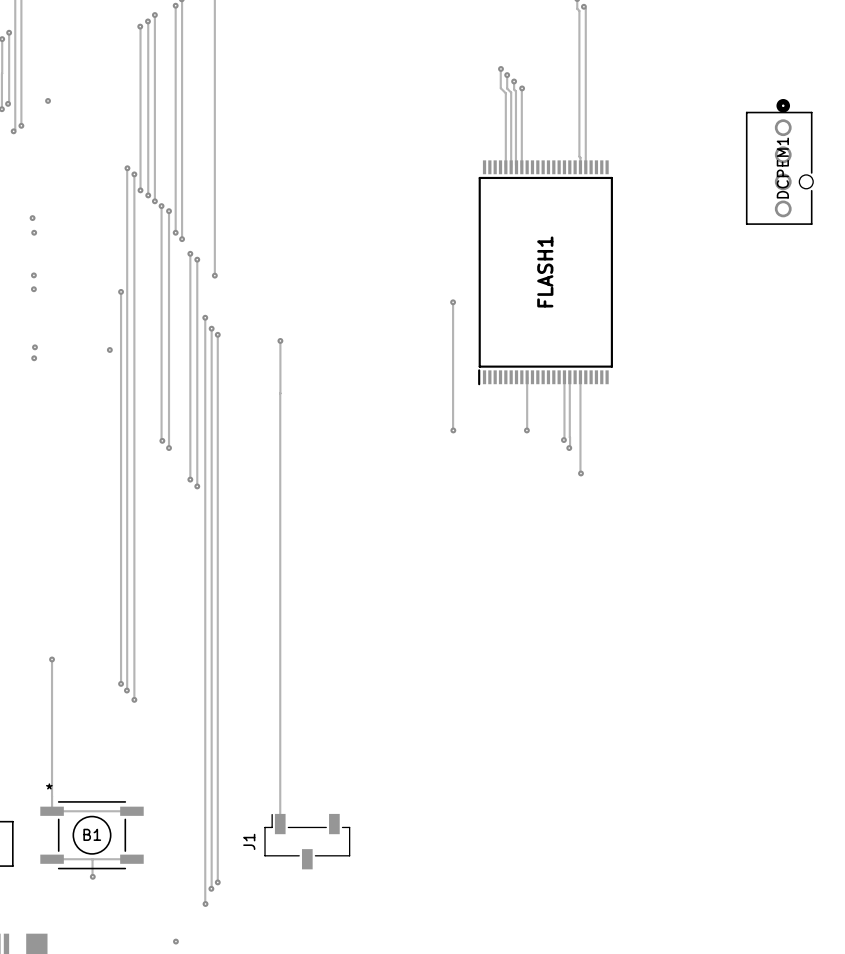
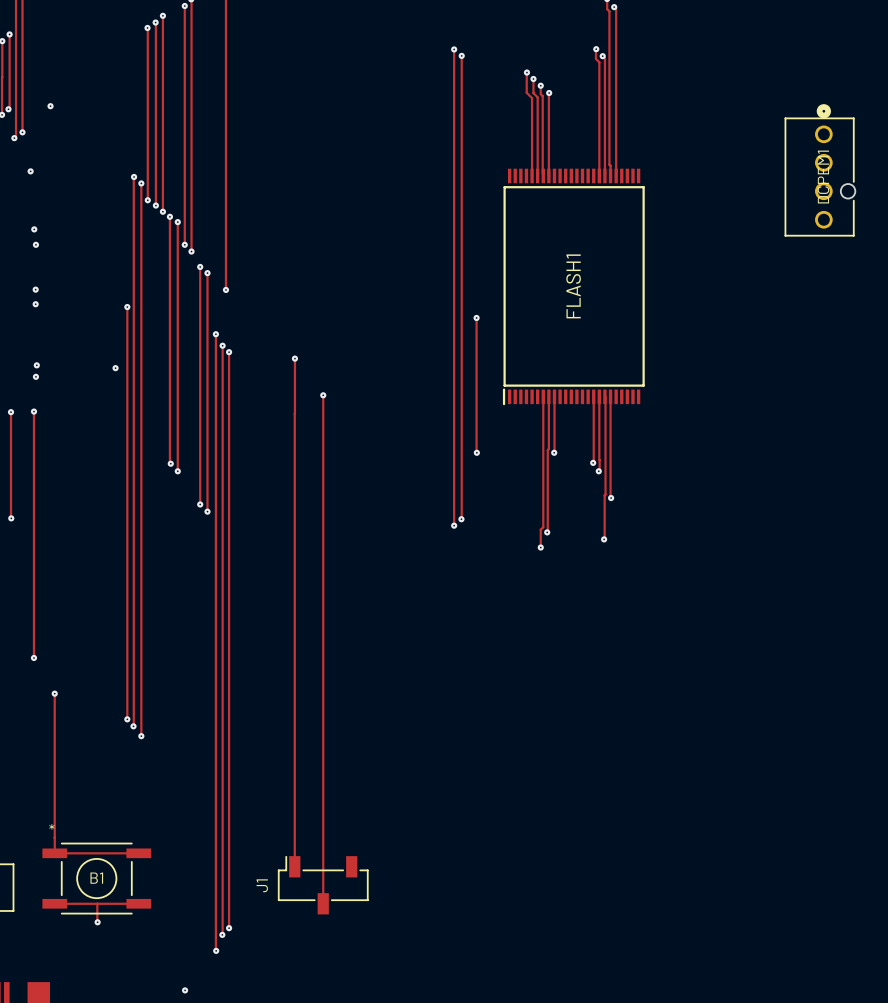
track: none -> (596, 49) (595, 58) (599, 62) (599, 175)
via: none -> (596, 49)
track: none -> (454, 49) (454, 525)
via: none -> (454, 49)
track: none -> (461, 55) (461, 519)
via: none -> (461, 55)
track: none -> (602, 56) (604, 58) (604, 175)
via: none -> (602, 56)
via: none -> (30, 171)
track: none -> (323, 395) (323, 903)
via: none -> (323, 395)
track: none -> (543, 396) (543, 527) (540, 529) (540, 547)
track: none -> (548, 396) (547, 532)
track: none -> (604, 396) (604, 539)
track: none -> (11, 412) (11, 518)
via: none -> (11, 412)
track: none -> (33, 411) (33, 657)
via: none -> (33, 411)
via: none -> (11, 518)
via: none -> (461, 519)
via: none -> (454, 525)
via: none -> (547, 532)
via: none -> (604, 539)
via: none -> (540, 547)
via: none -> (33, 657)

